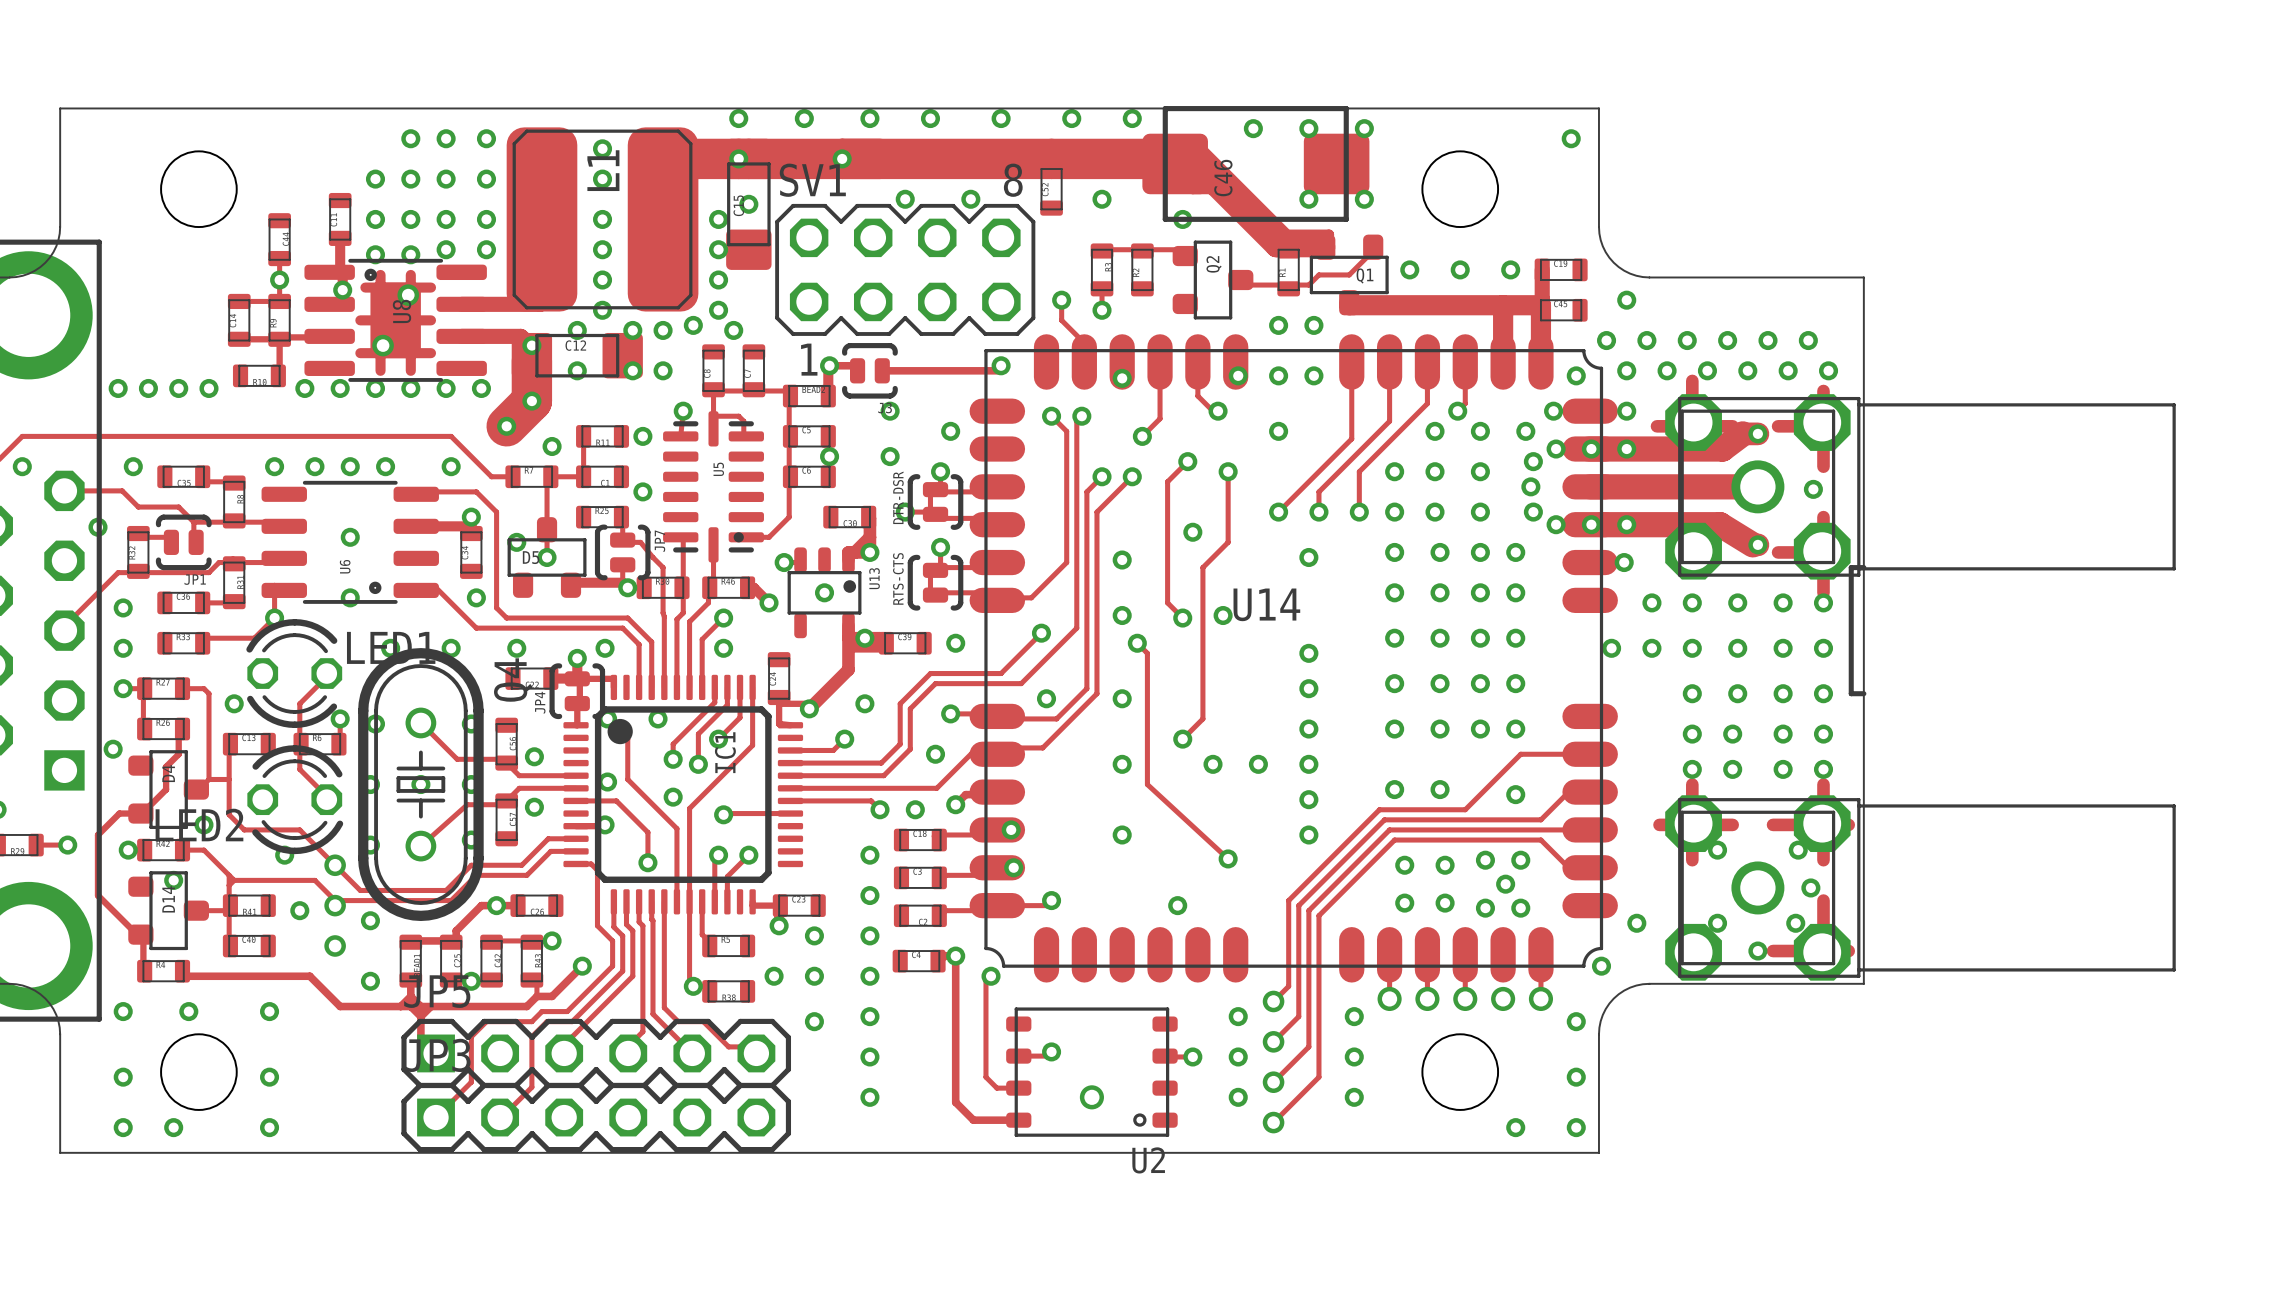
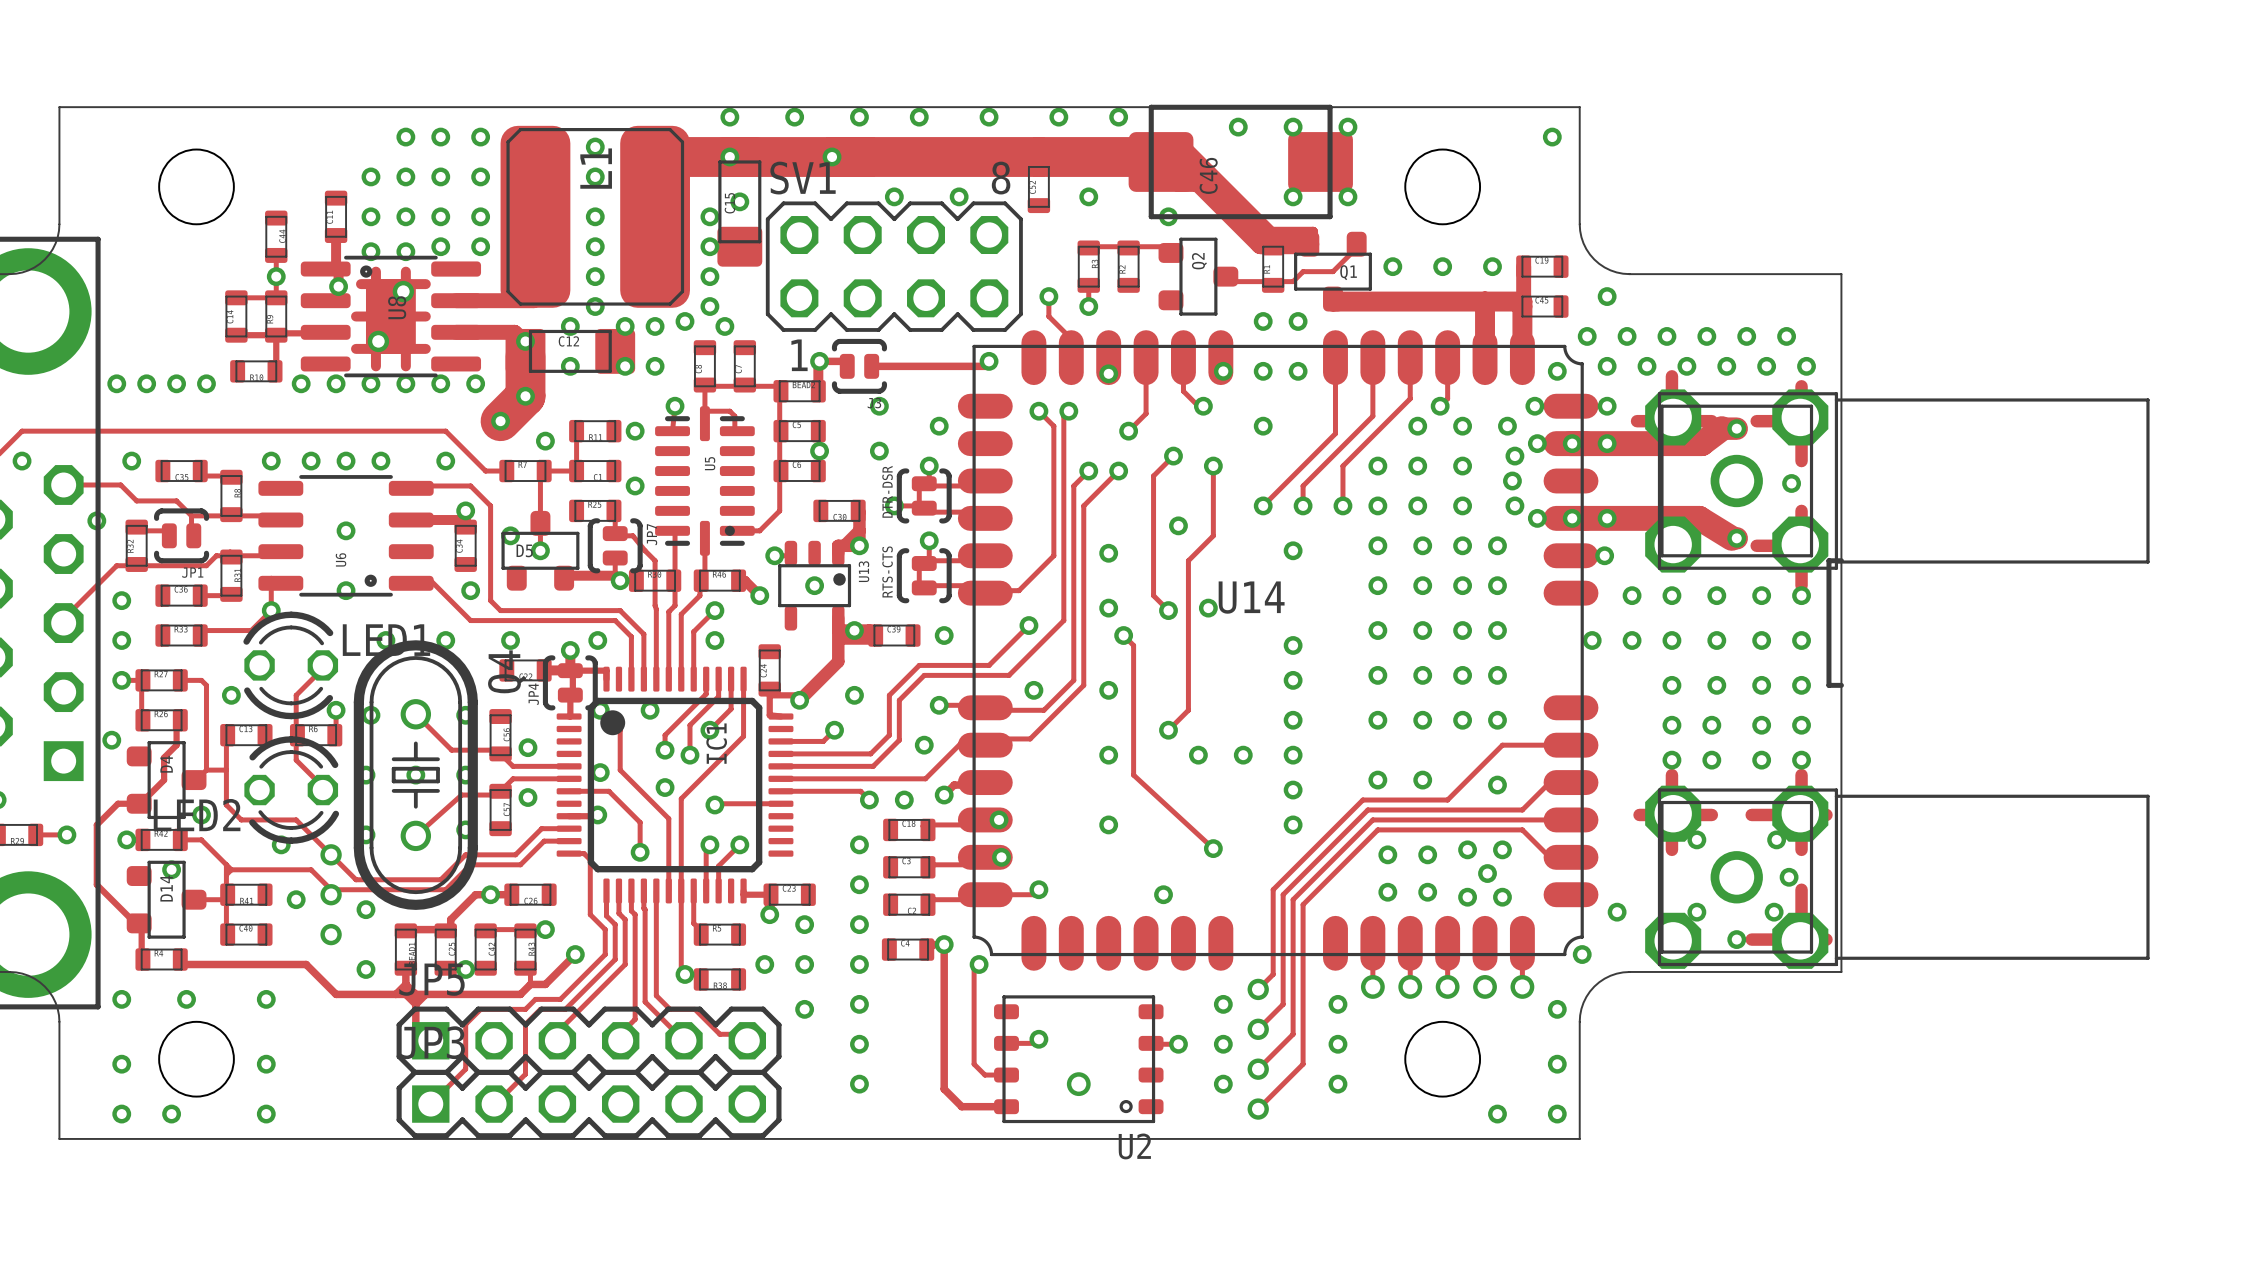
track: (1590, 486) (1757, 486) -> none

